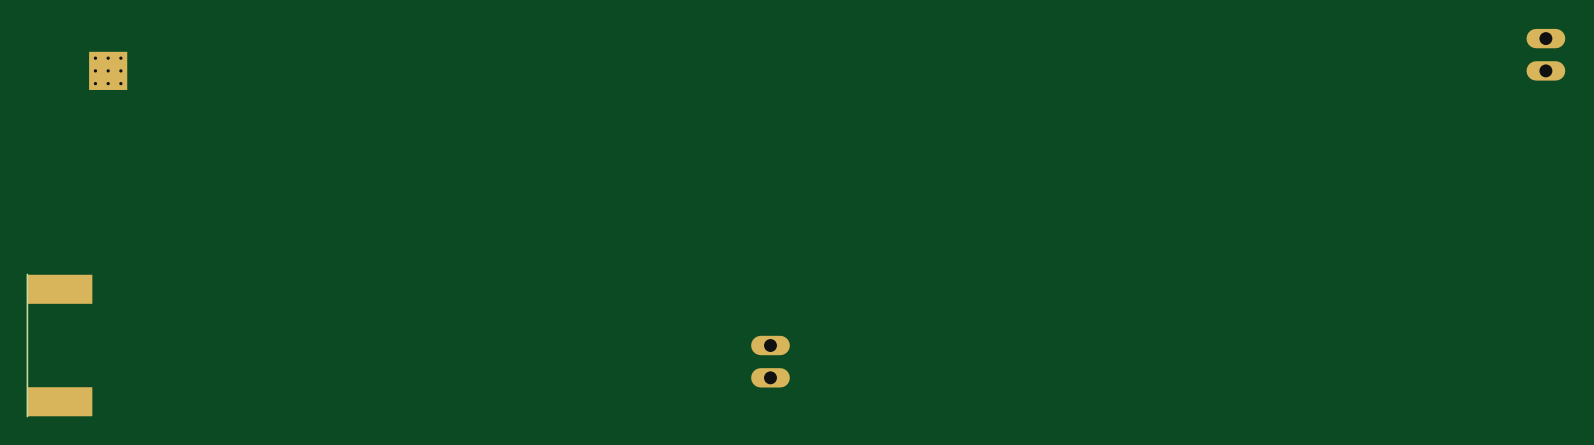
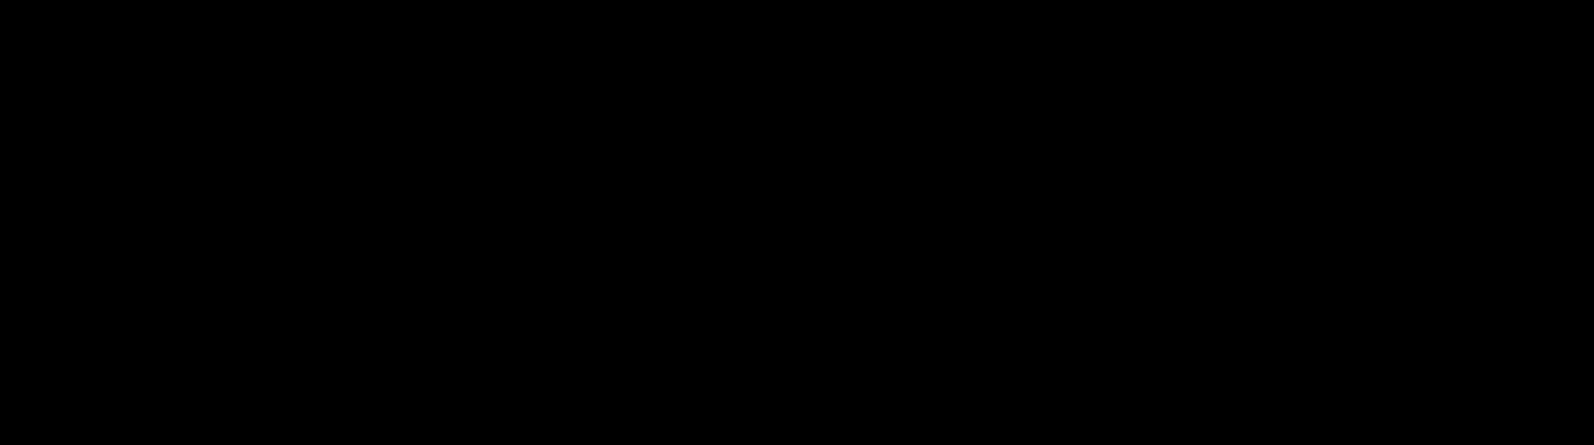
part: (1545, 54) -> none
part: (108, 70) -> none
part: (59, 345) -> none
part: (770, 361) -> none

